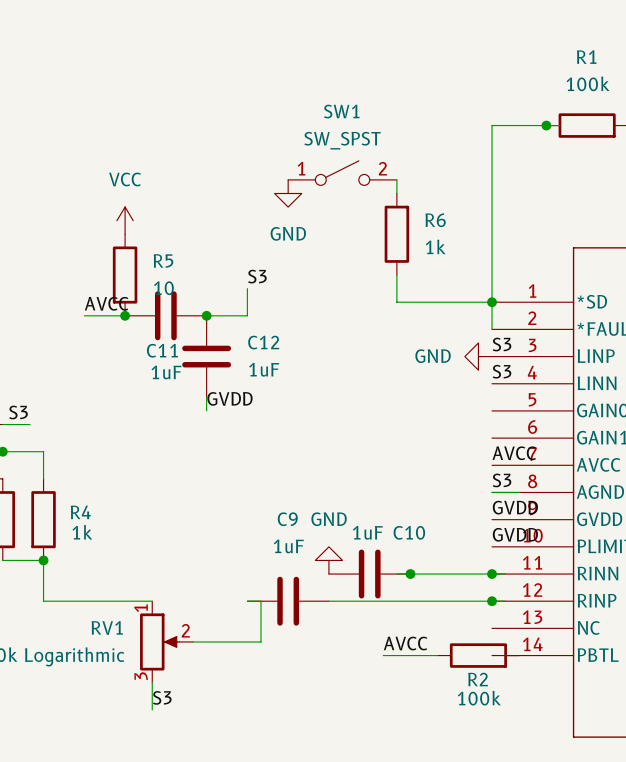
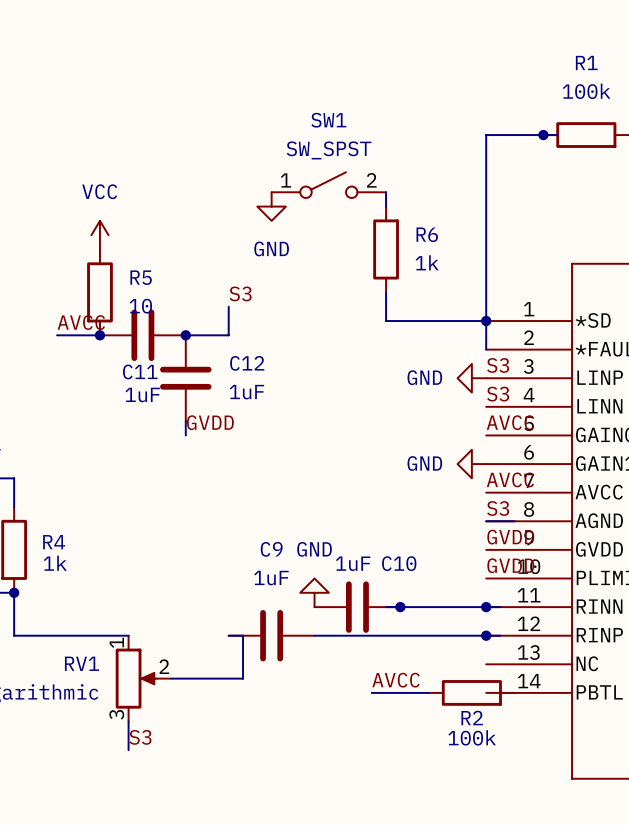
label: none -> AVCC (510, 422)
power symbol: none -> GND (471, 464)

